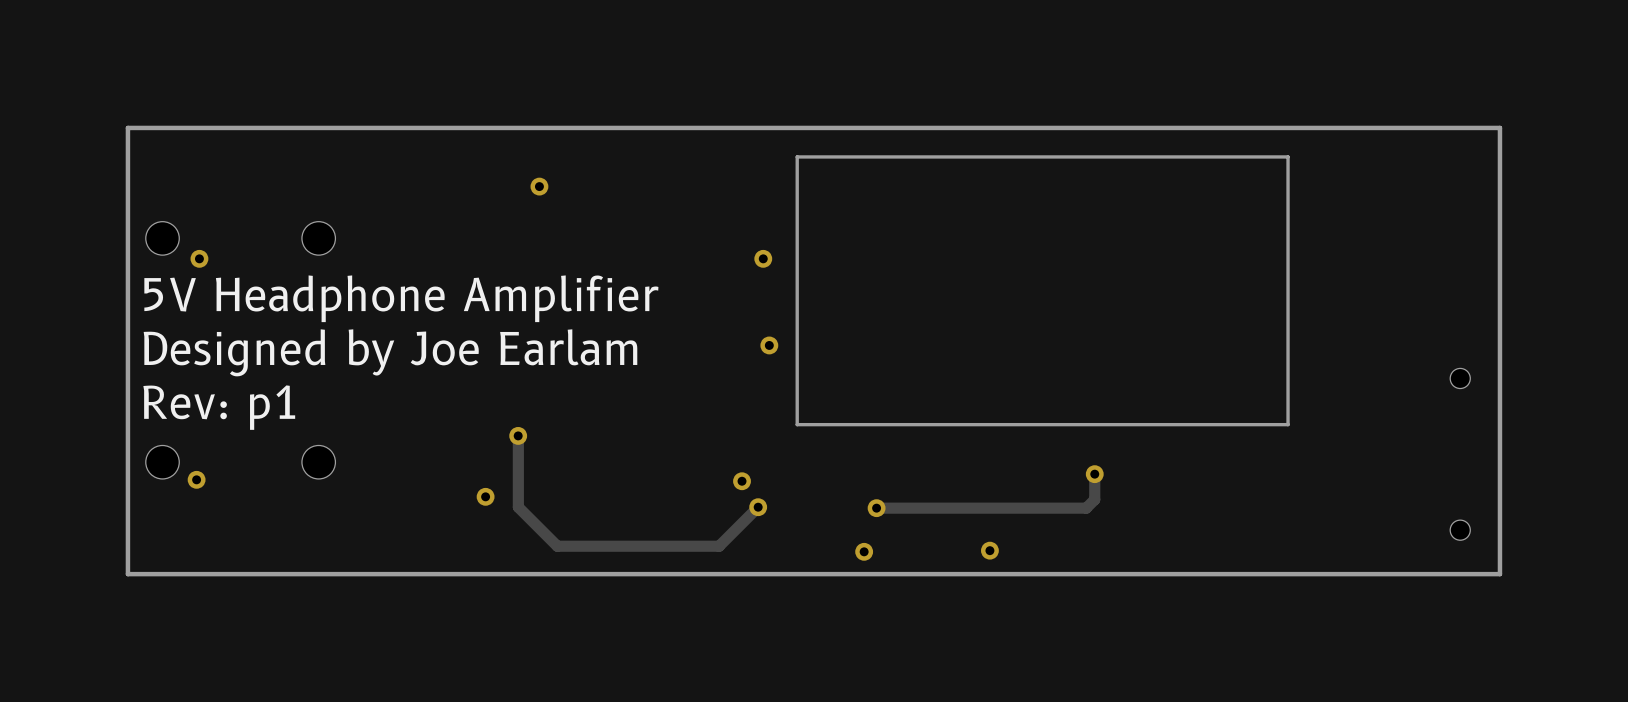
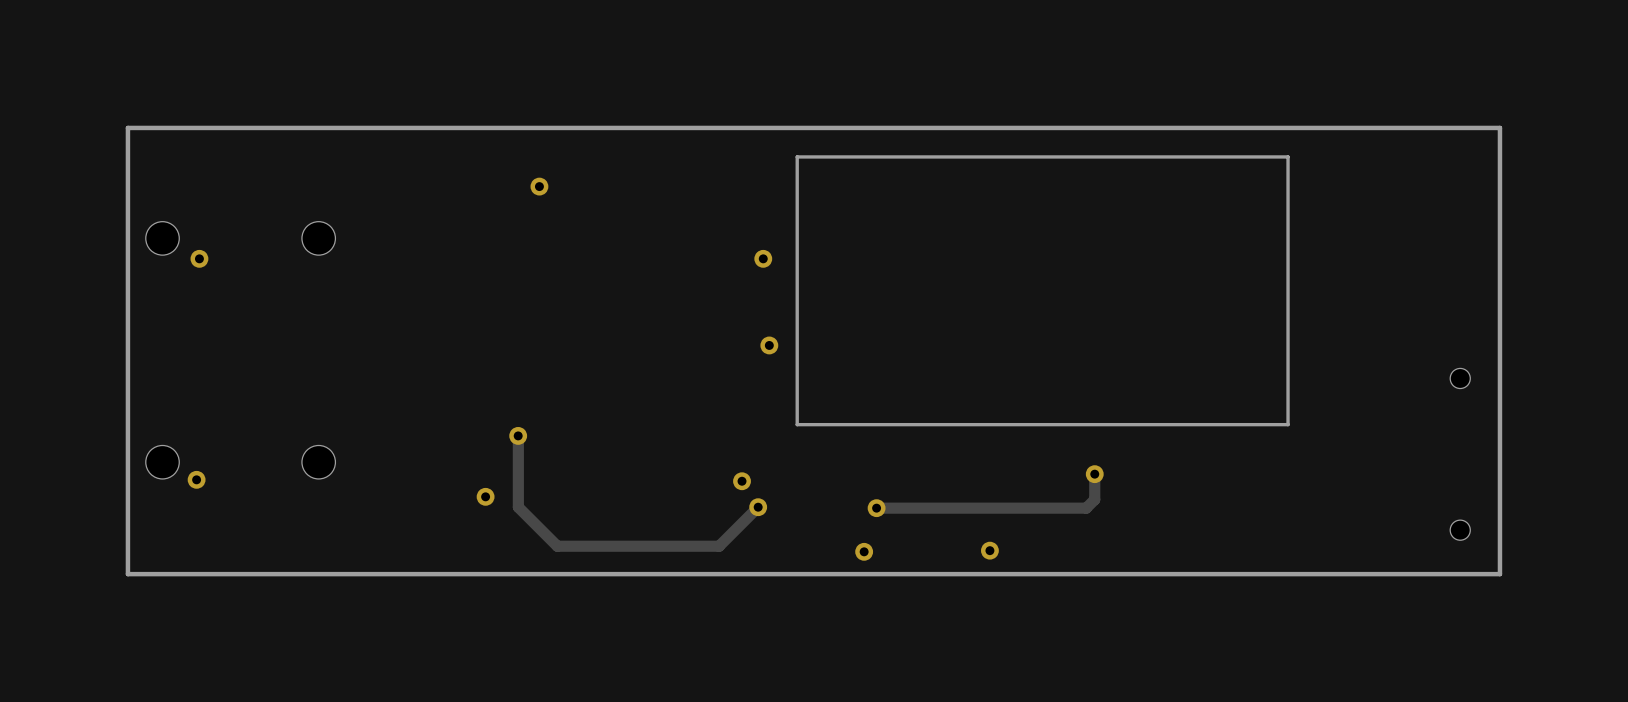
text: 5V Headphone Amplifier (401, 298) -> none
text: Designed by Joe Earlam (390, 352) -> none
text: Rev: p1 (219, 407) -> none

